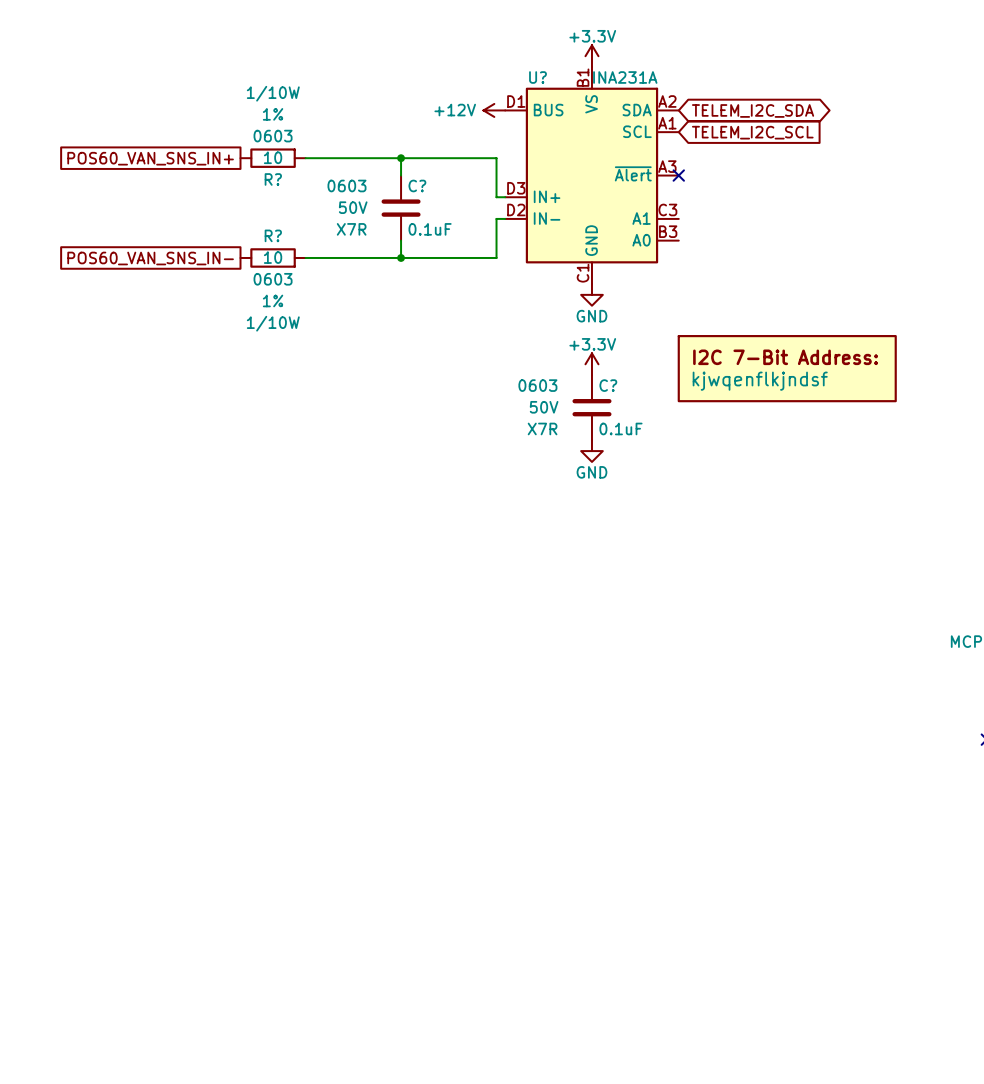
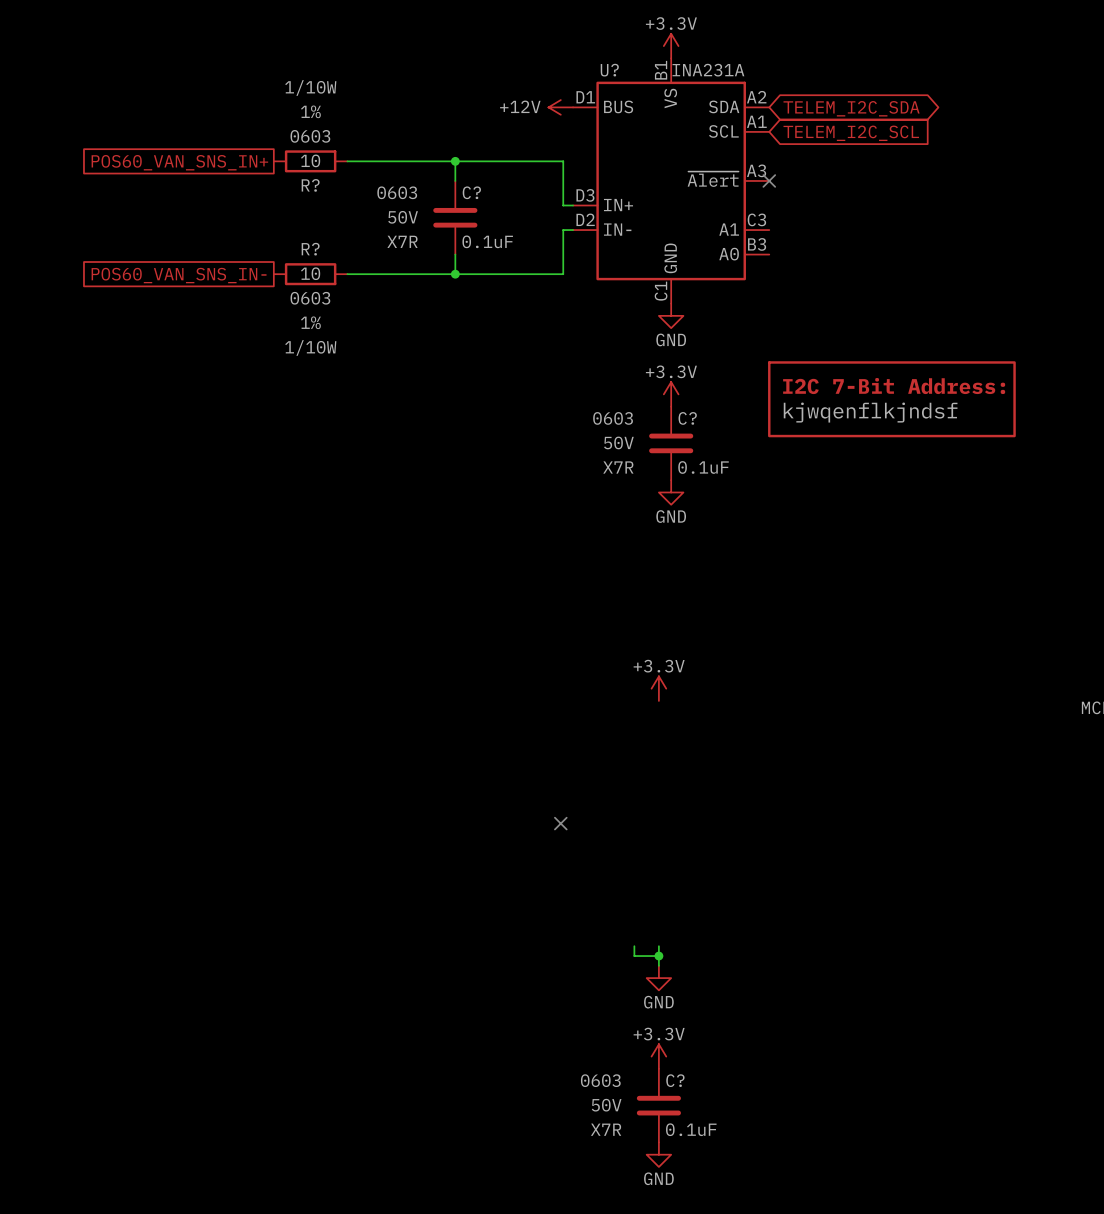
power symbol: none -> +3.3V (658, 688)
no-connect mark: none -> (560, 823)
wire: none -> (634, 946) (634, 956) (658, 956)
wire: none -> (658, 946) (658, 965)
junction: none -> (658, 956)
power symbol: none -> GND (658, 978)
power symbol: none -> +3.3V (658, 1056)
C?: none -> 0.1uF (658, 1105)
power symbol: none -> GND (658, 1154)

